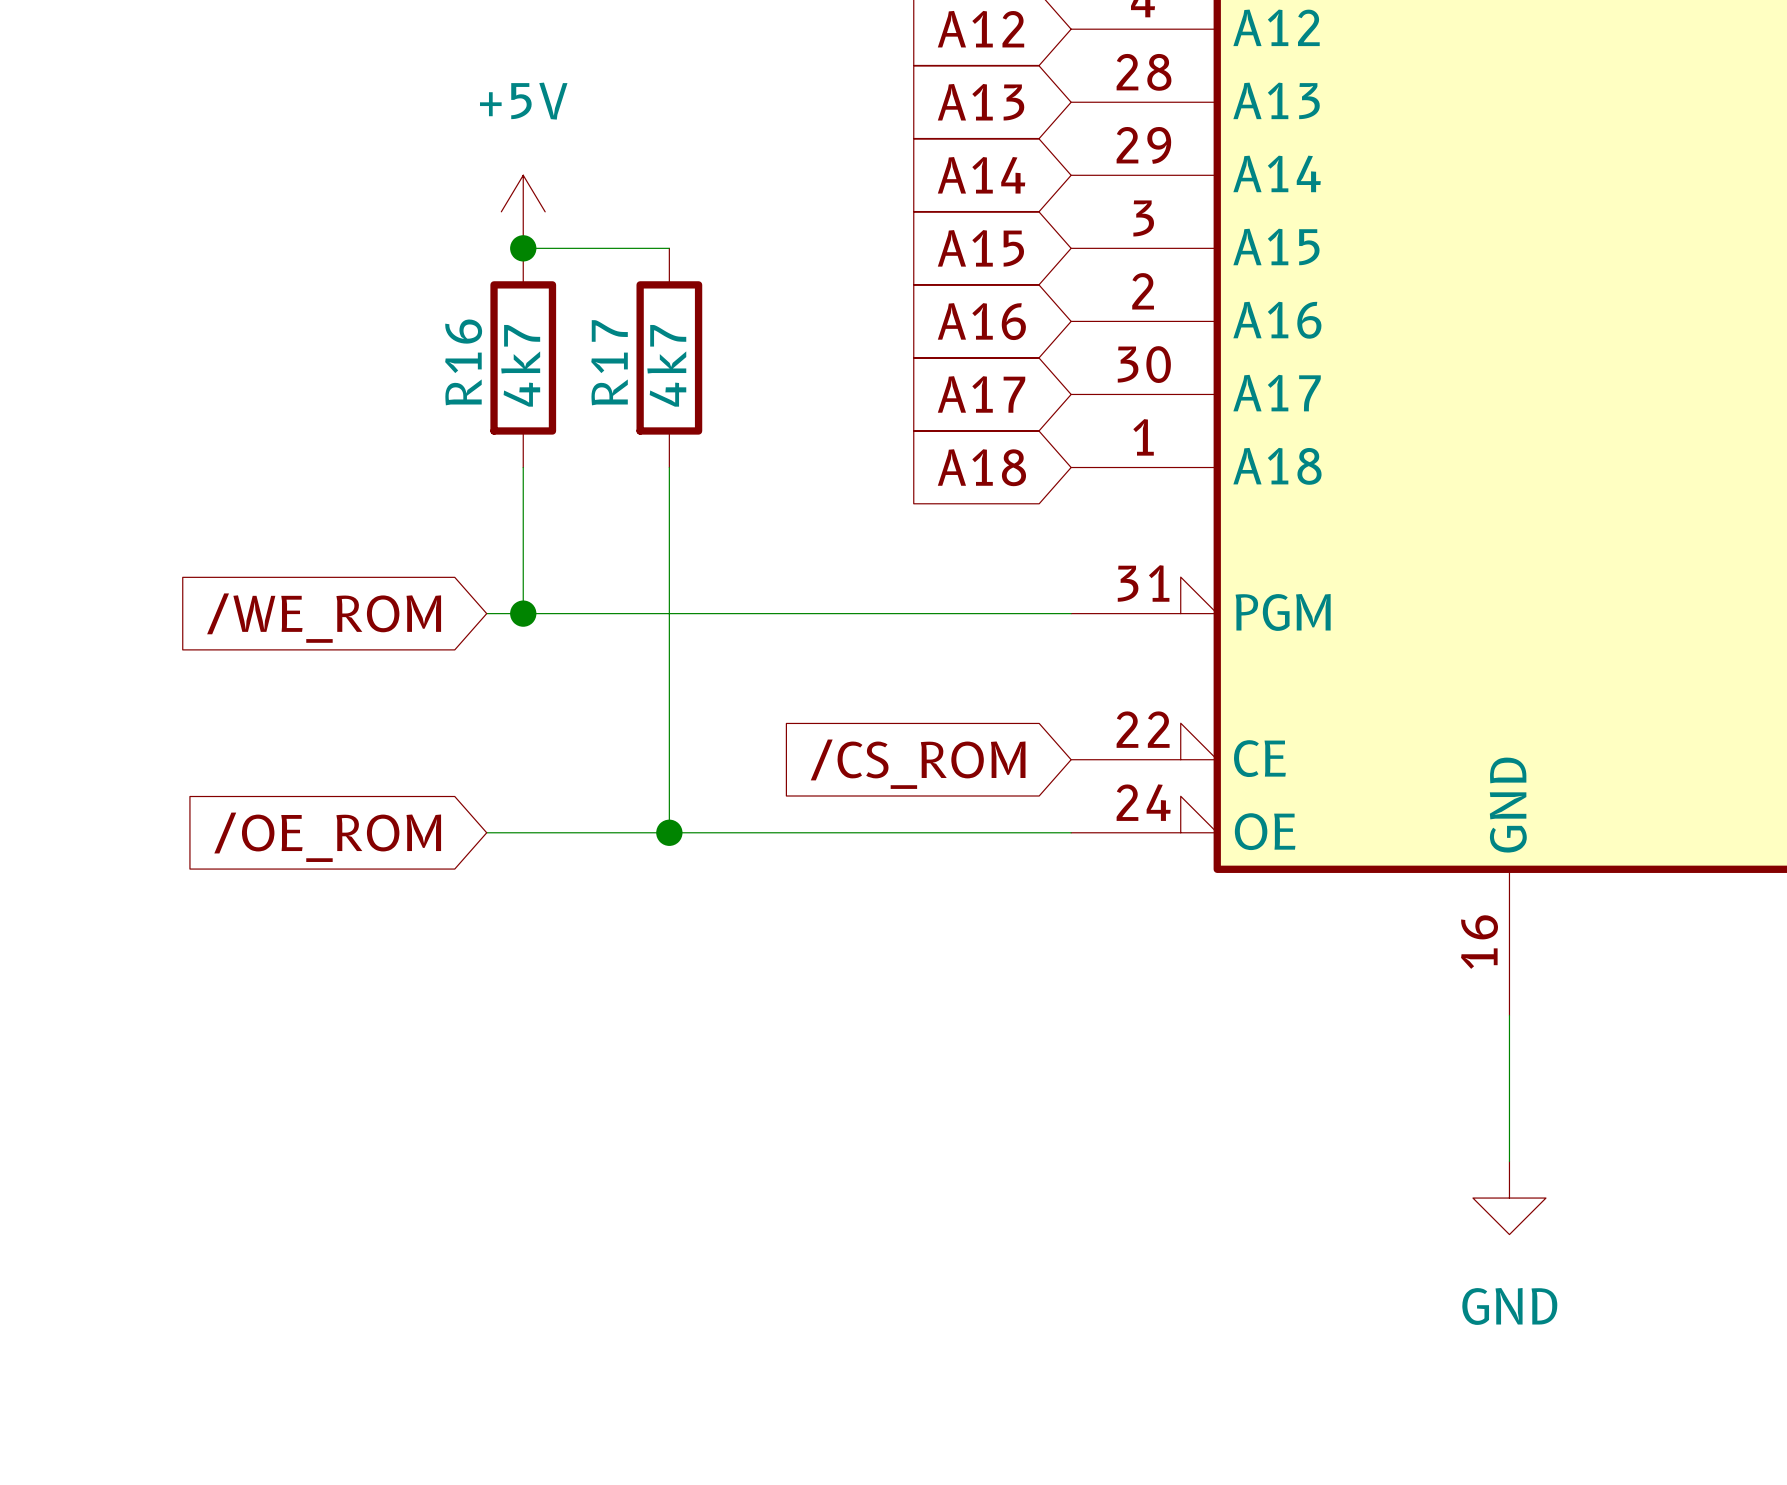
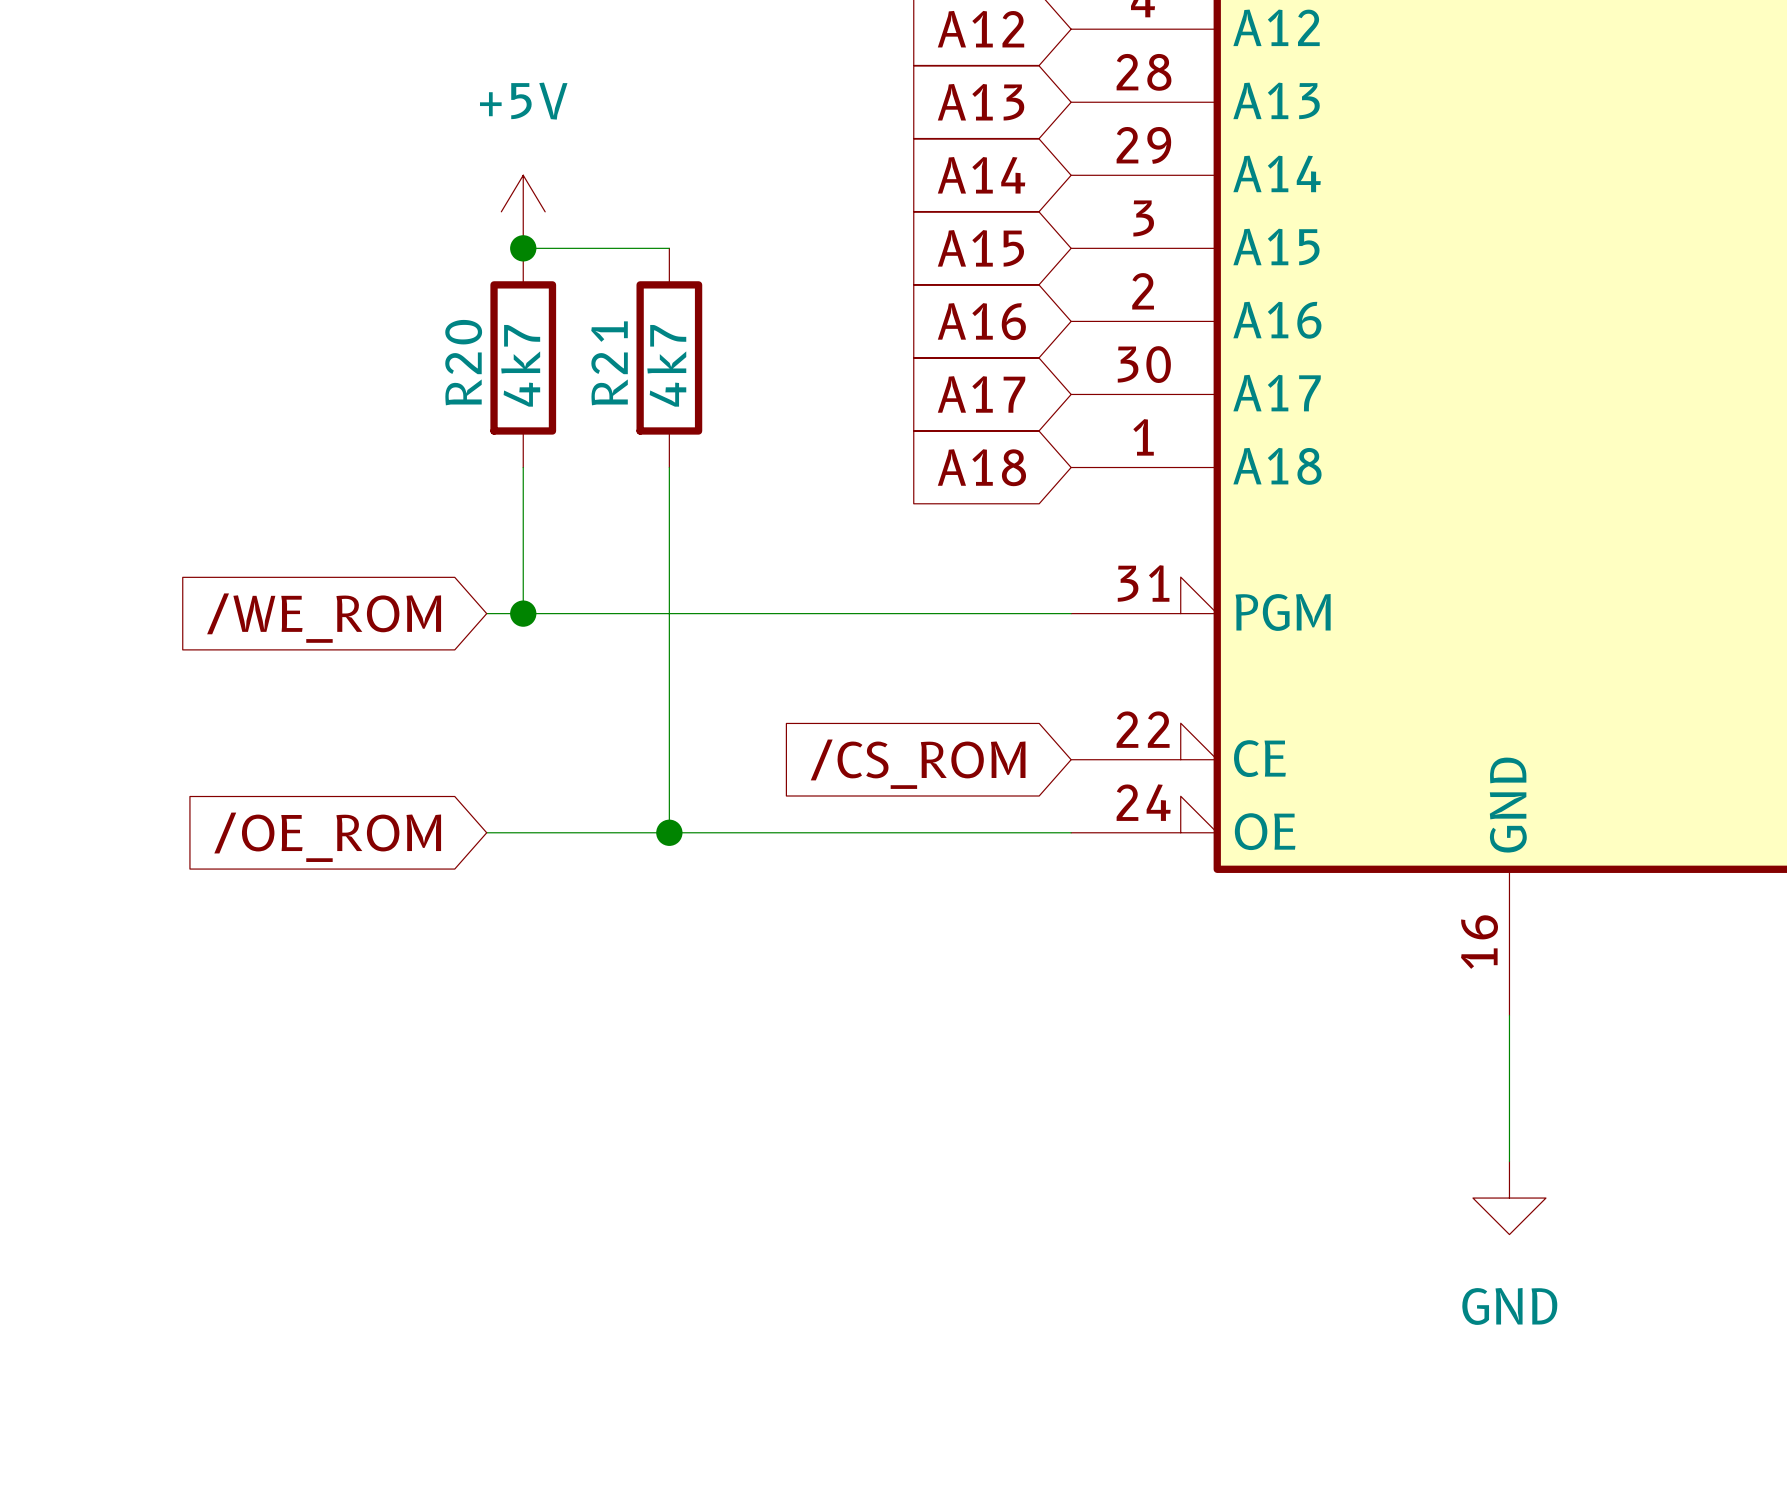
R16 name: R16 (463, 362) -> R20 (463, 362)
R17 name: R17 (609, 362) -> R21 (609, 363)

